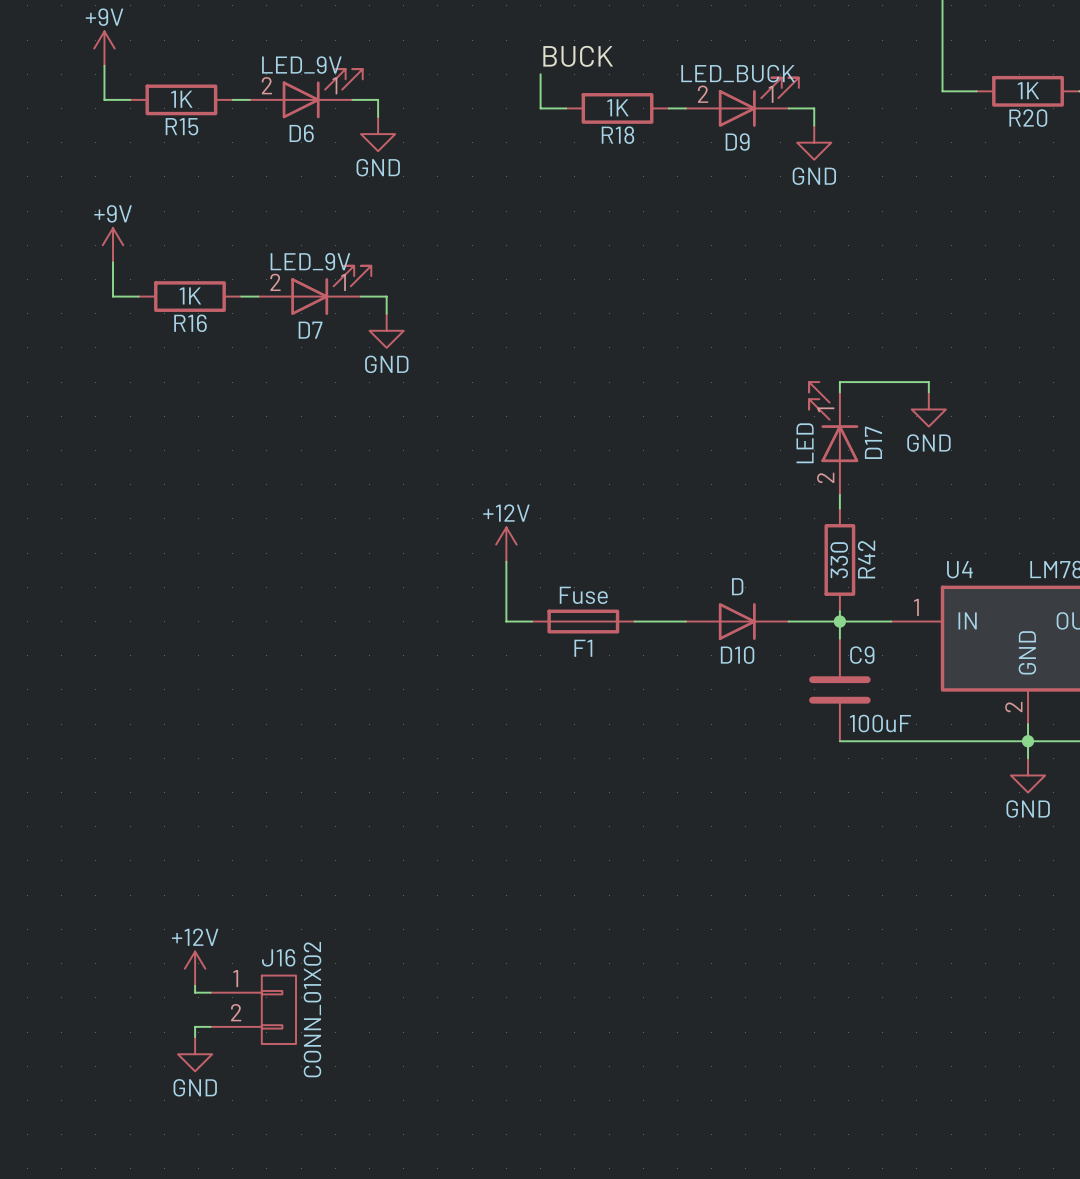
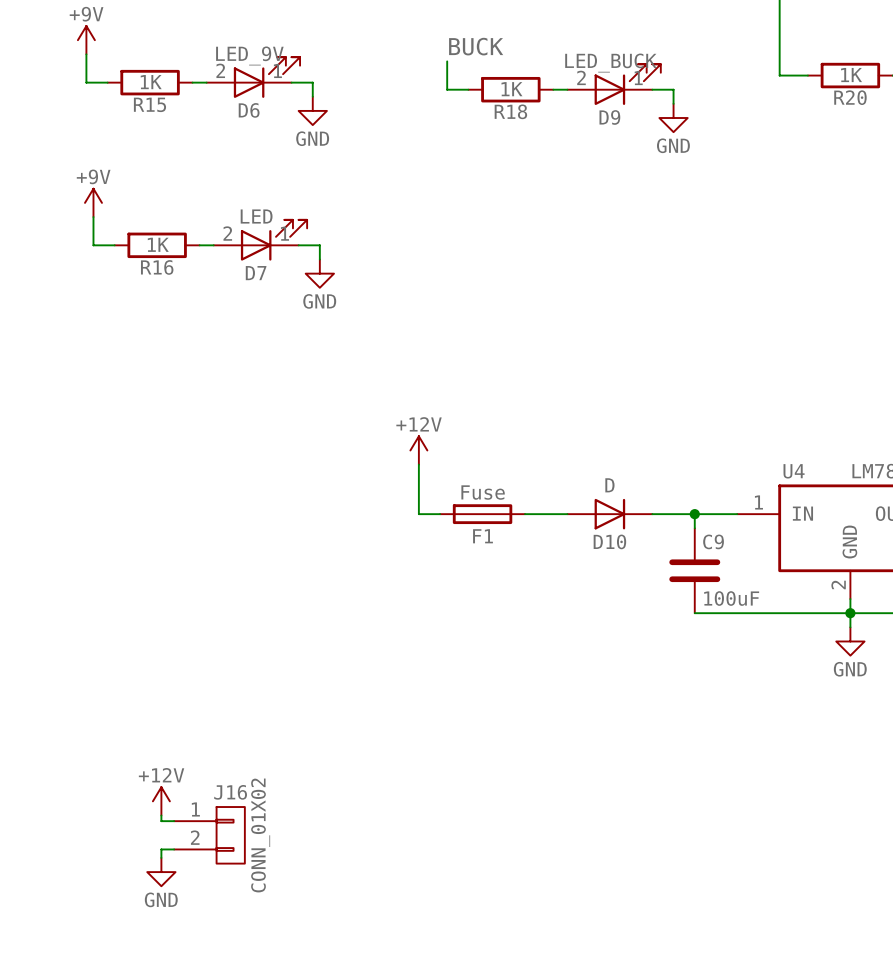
D7 value: LED_9V (310, 261) -> LED (256, 216)
wire: (839, 392) (839, 382) (928, 382) (928, 392) -> none
power symbol: GND (928, 409) -> none
D17: LED (833, 438) -> none
wire: (839, 494) (839, 508) -> none
R42: 330 (839, 559) -> none

